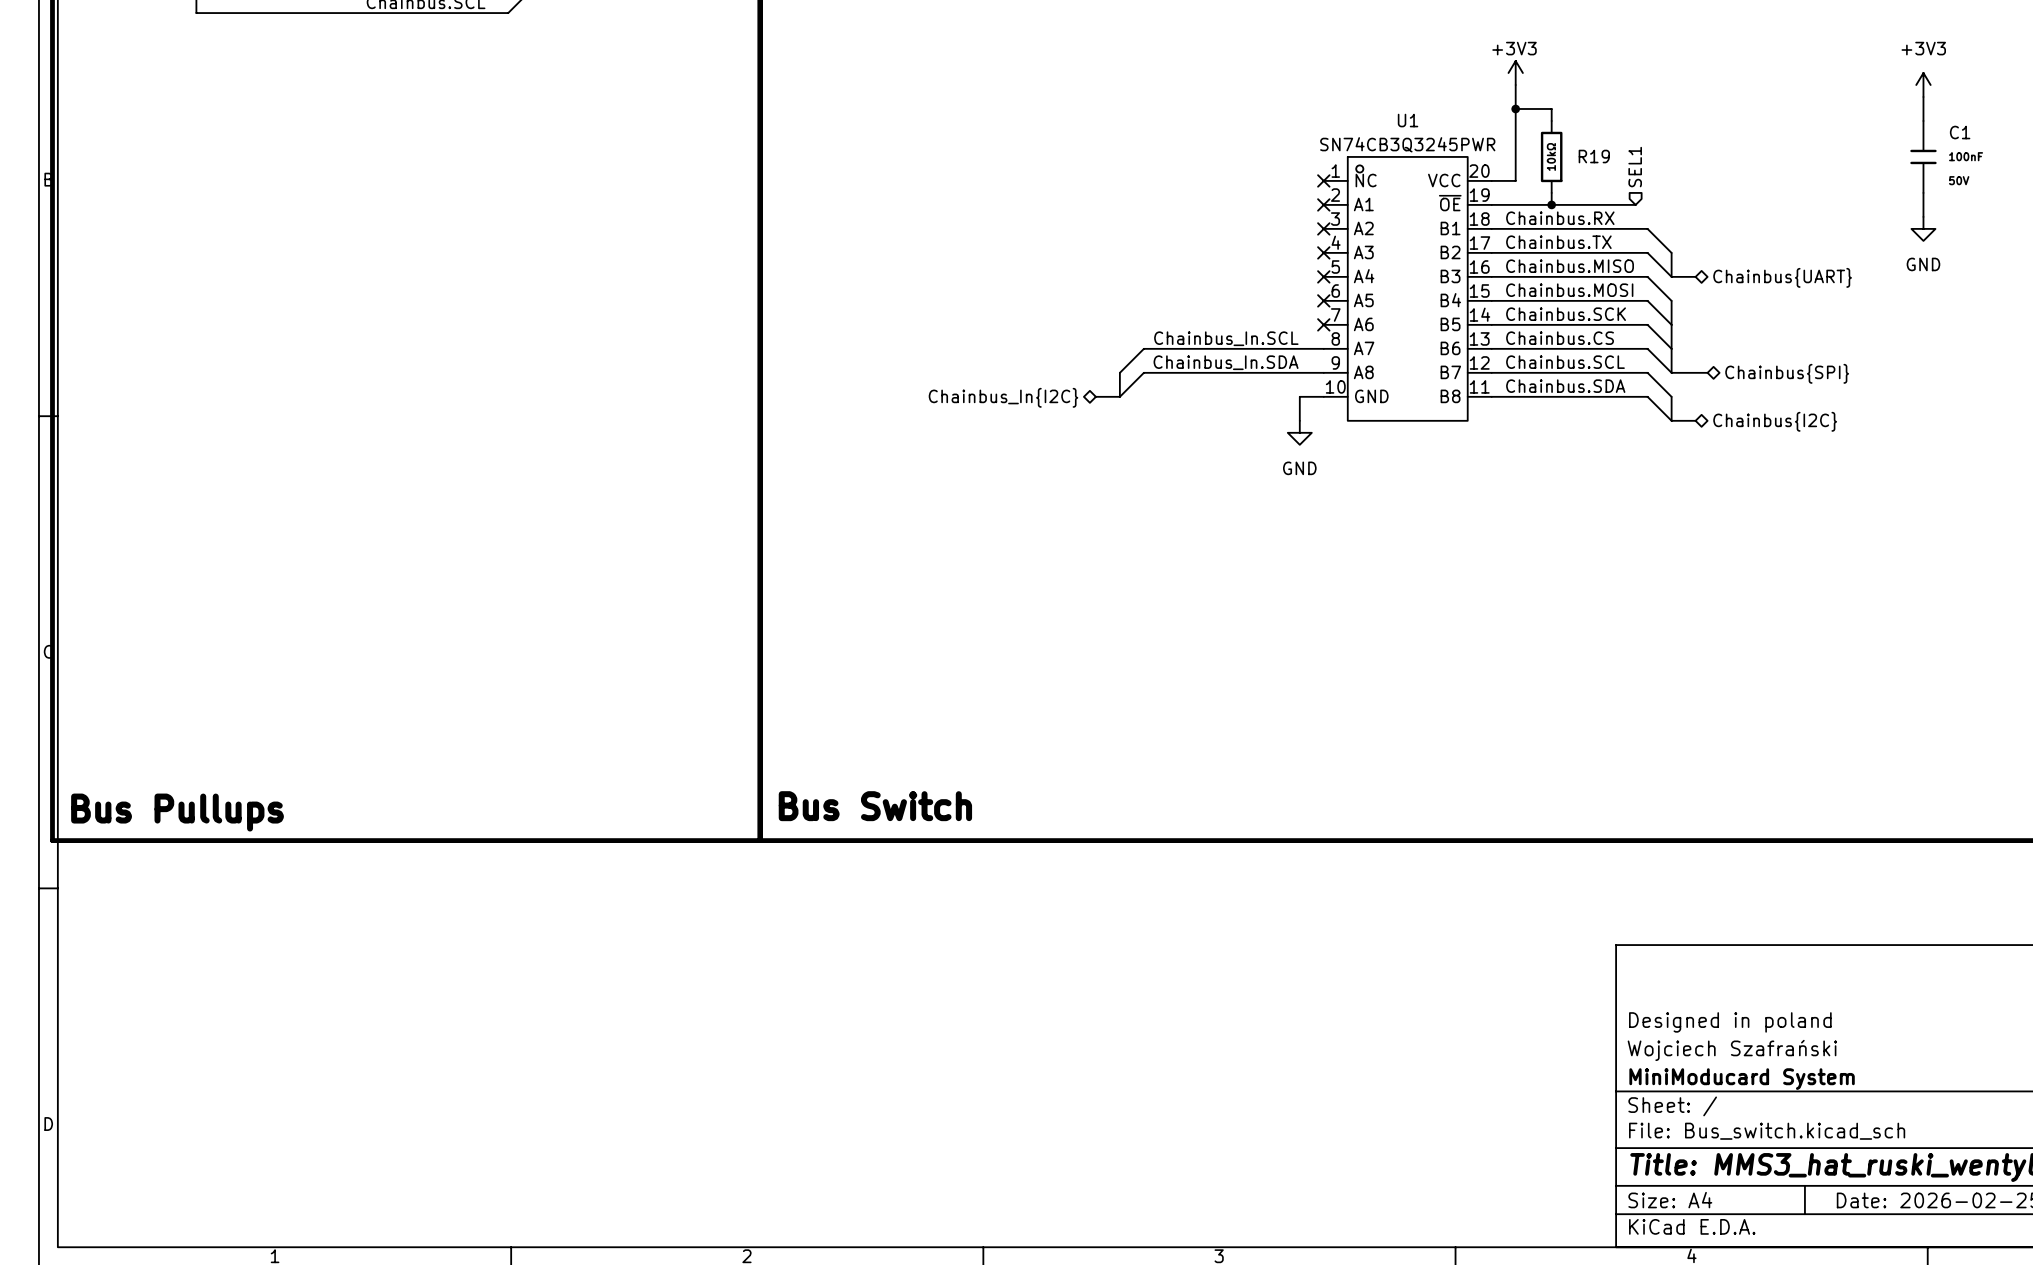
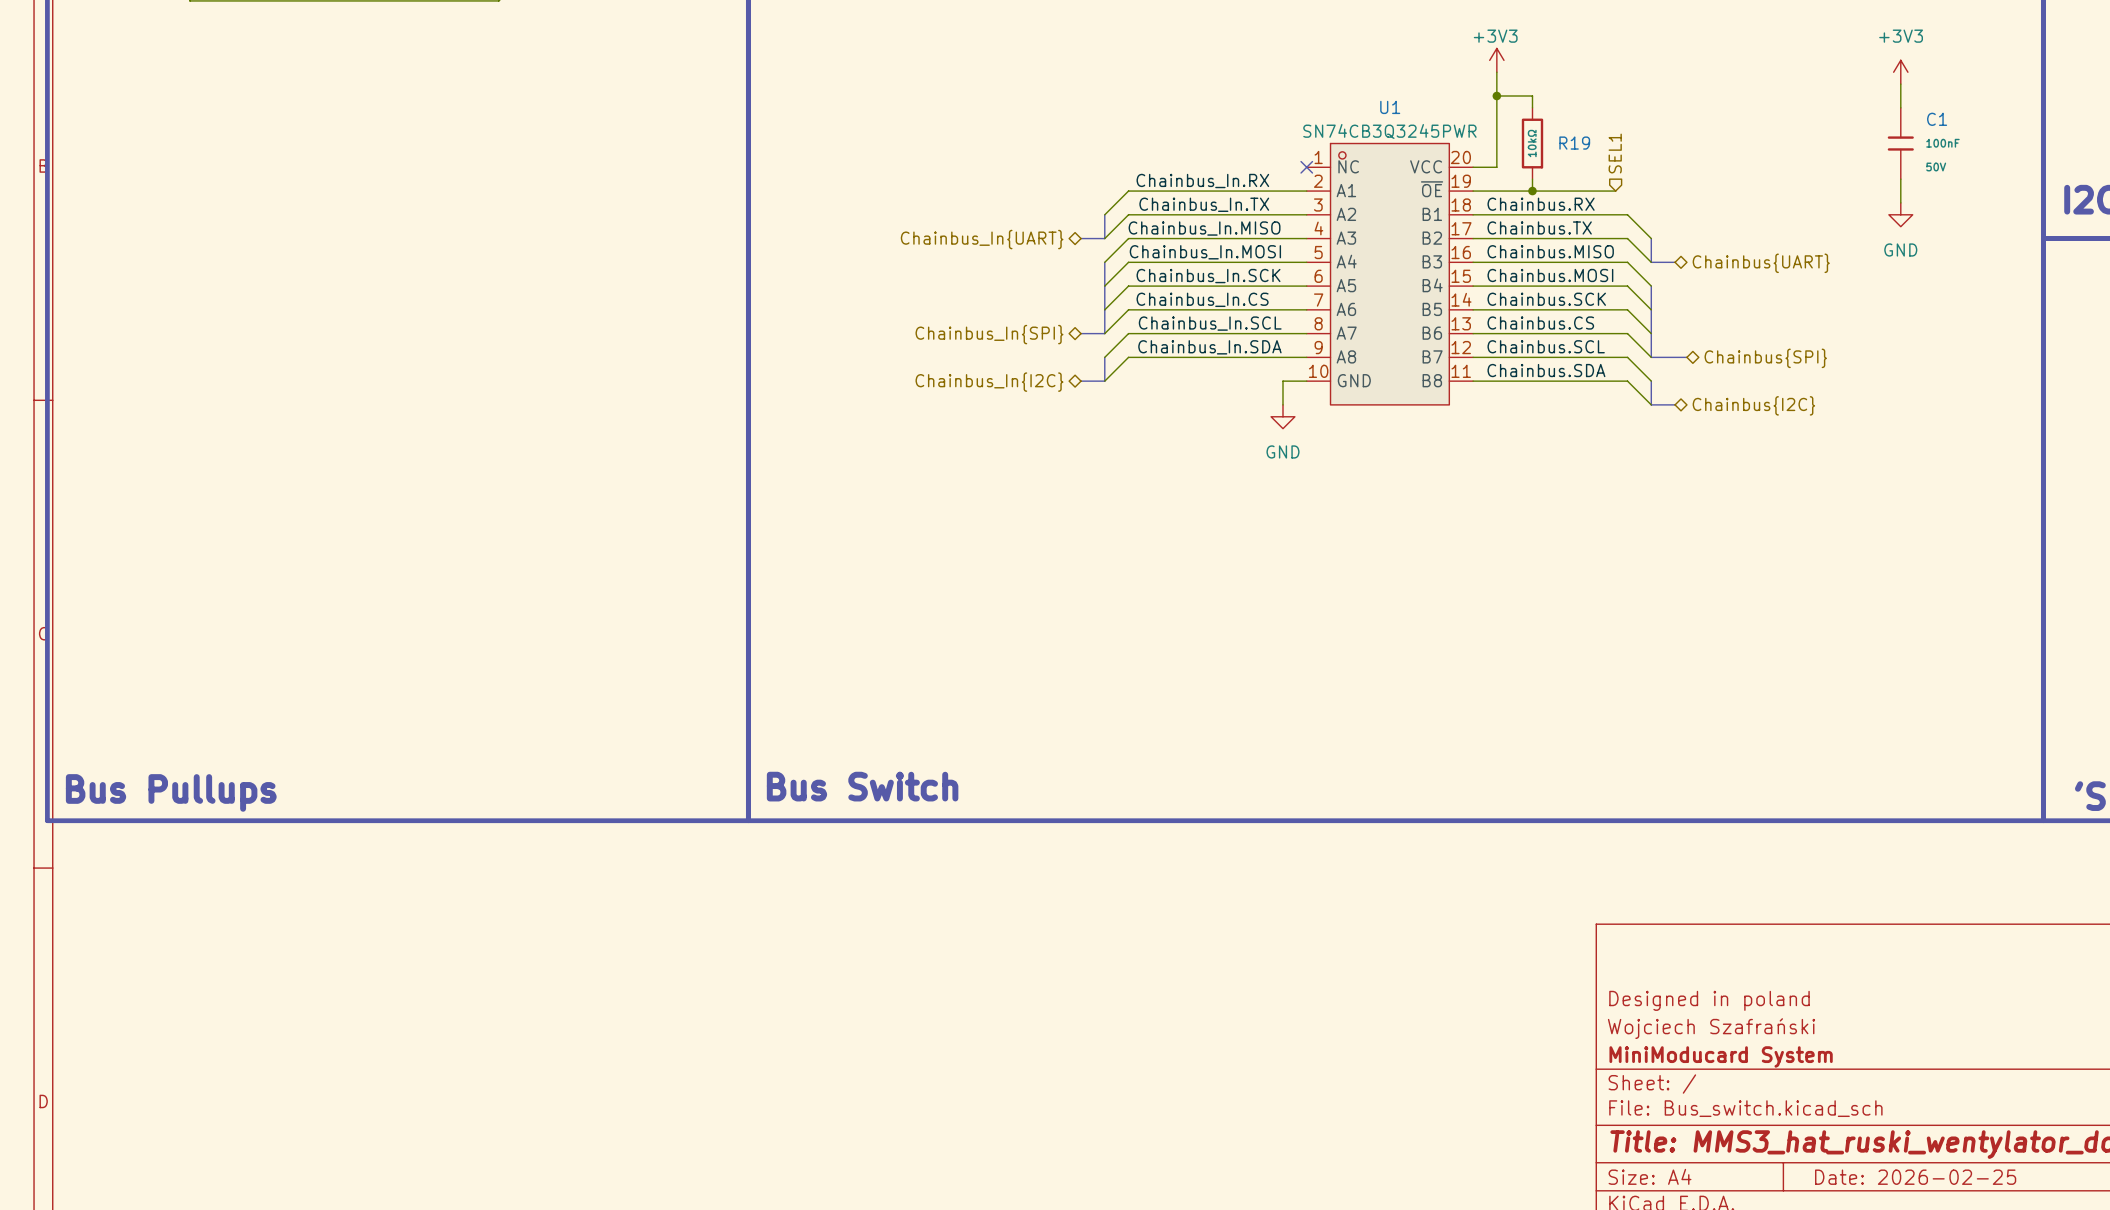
label: none -> Chainbus_In.RX (1202, 181)
wire: none -> (1306, 191) (1128, 191) (1104, 214)
no-connect mark: (1323, 204) -> none
label: none -> Chainbus_In.TX (1204, 204)
bus: none -> (1104, 214) (1104, 238) (1081, 238)
wire: none -> (1306, 214) (1128, 214) (1104, 238)
no-connect mark: (1323, 228) -> none
label: none -> Chainbus_In.MISO (1204, 228)
wire: none -> (1306, 238) (1128, 238) (1104, 262)
no-connect mark: (1323, 252) -> none
hierarchical label: none -> Chainbus_In{UART} (982, 239)
label: none -> Chainbus_In.MOSI (1205, 252)
bus: none -> (1104, 262) (1104, 333) (1081, 333)
wire: none -> (1306, 262) (1128, 262) (1104, 286)
no-connect mark: (1323, 276) -> none
label: none -> Chainbus_In.SCK (1208, 276)
wire: none -> (1306, 286) (1128, 286) (1104, 309)
no-connect mark: (1323, 300) -> none
label: none -> Chainbus_In.CS (1202, 299)
wire: none -> (1306, 309) (1128, 309) (1104, 333)
no-connect mark: (1323, 324) -> none
hierarchical label: none -> Chainbus_In{SPI} (989, 334)

